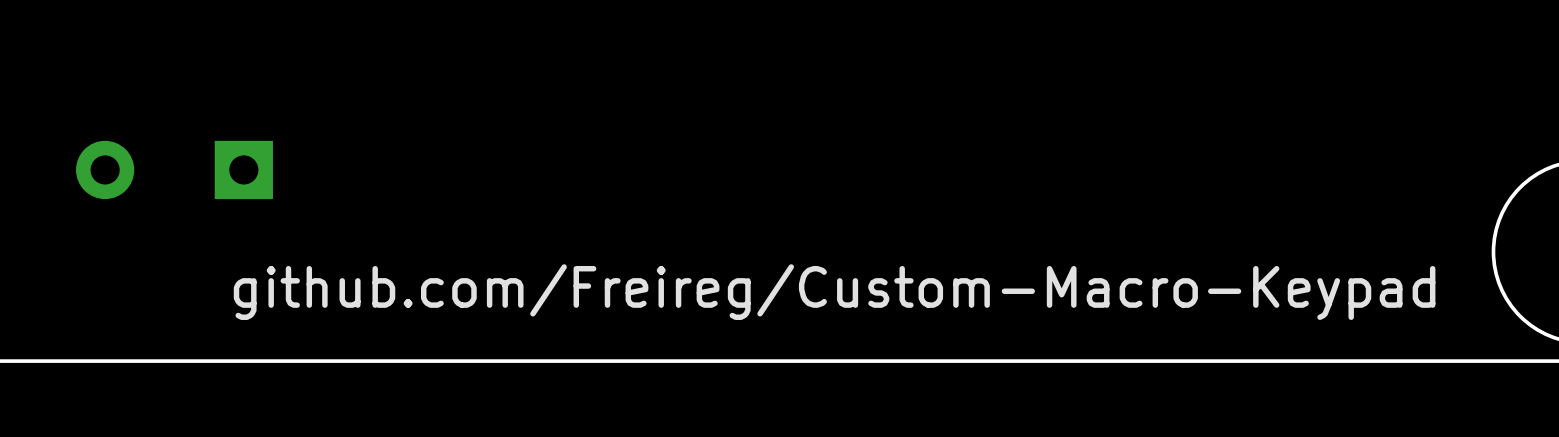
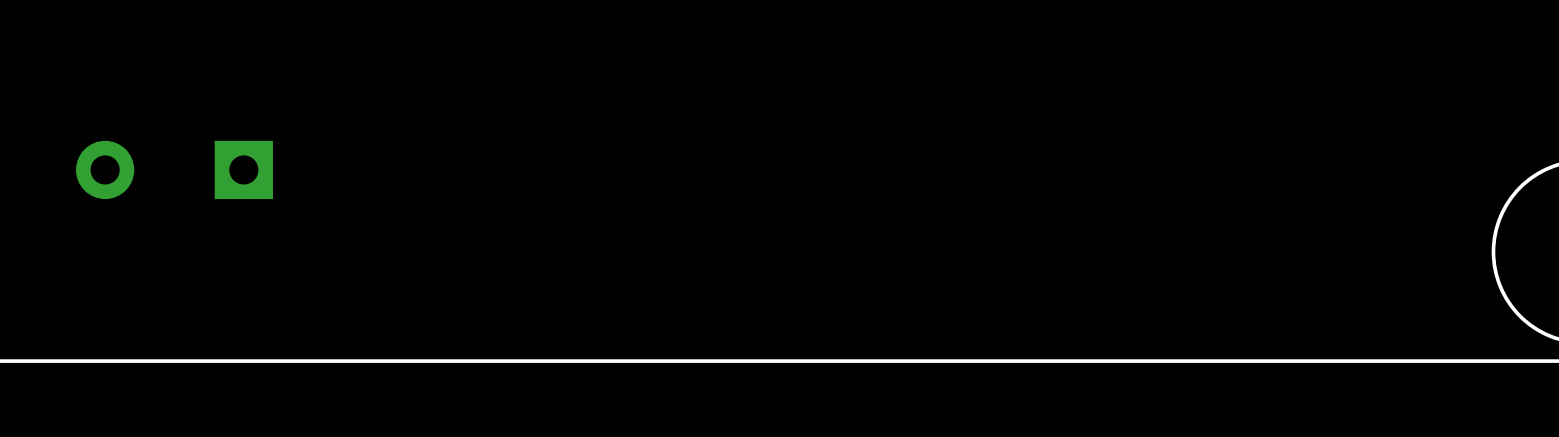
text: github.com/Freireg/Custom-Macro-Keypad (834, 292) -> none

